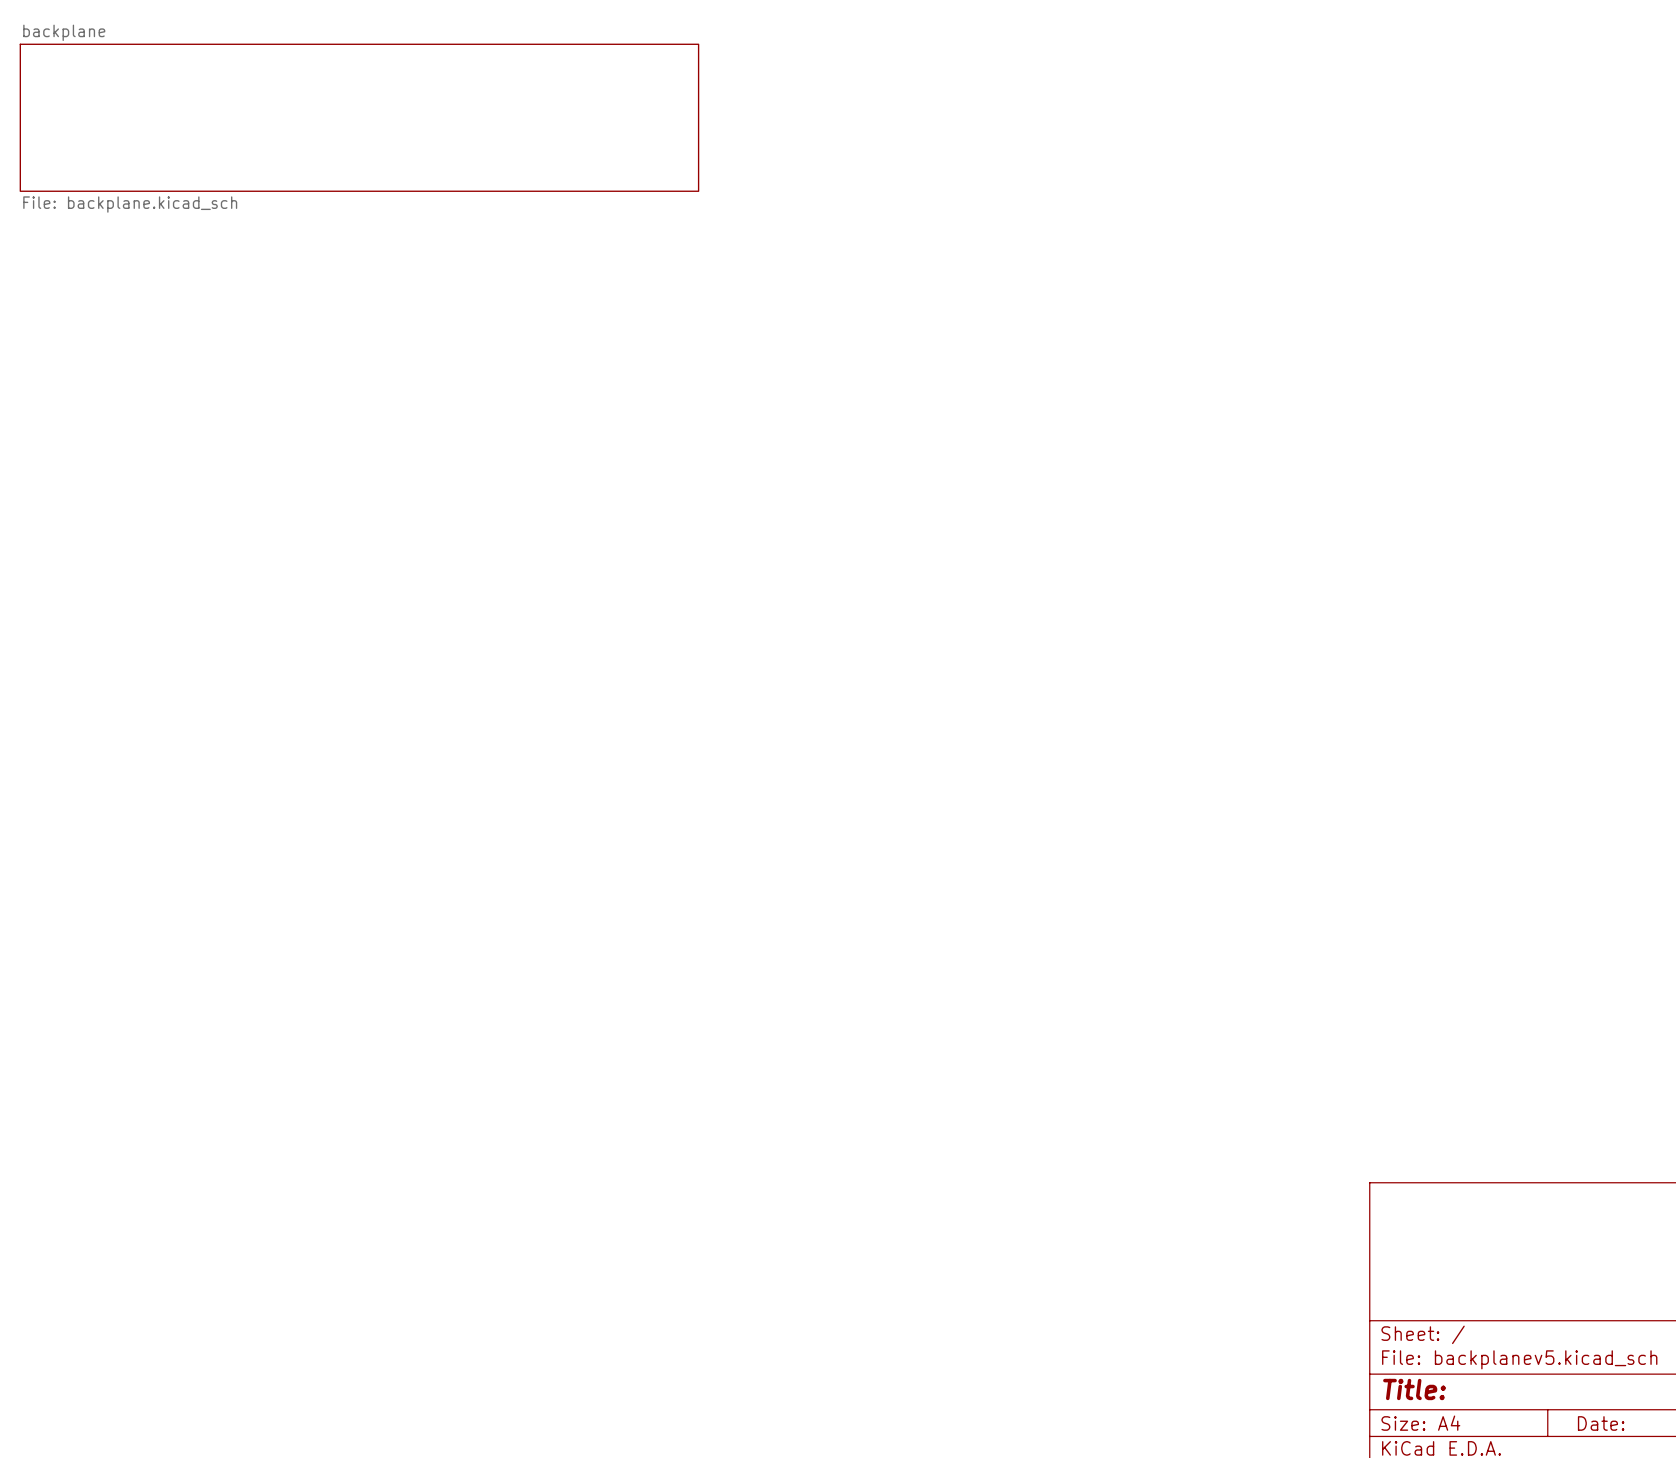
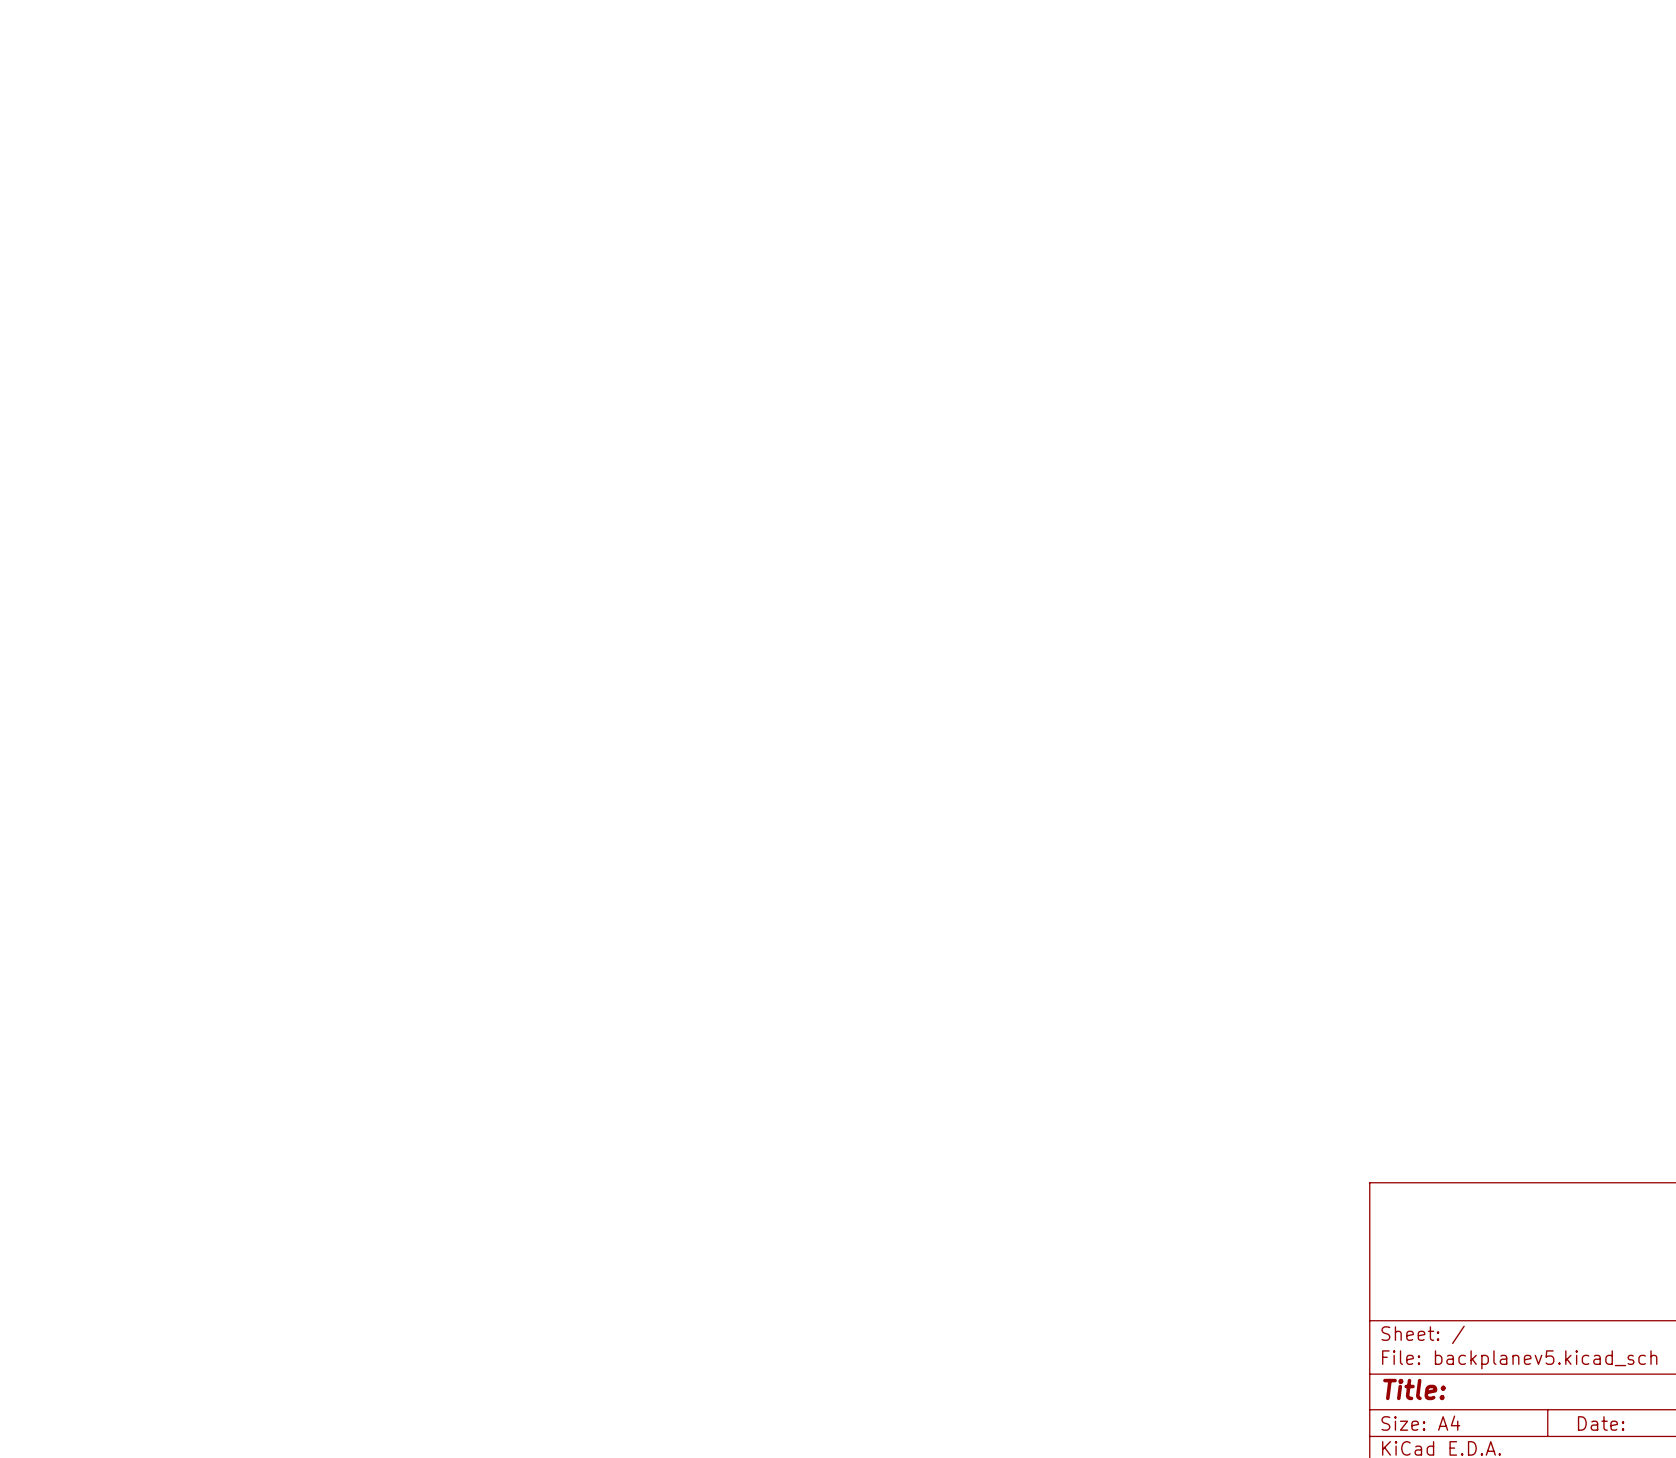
sheet backplane: File: backplane.kicad_sch (359, 117) -> none

